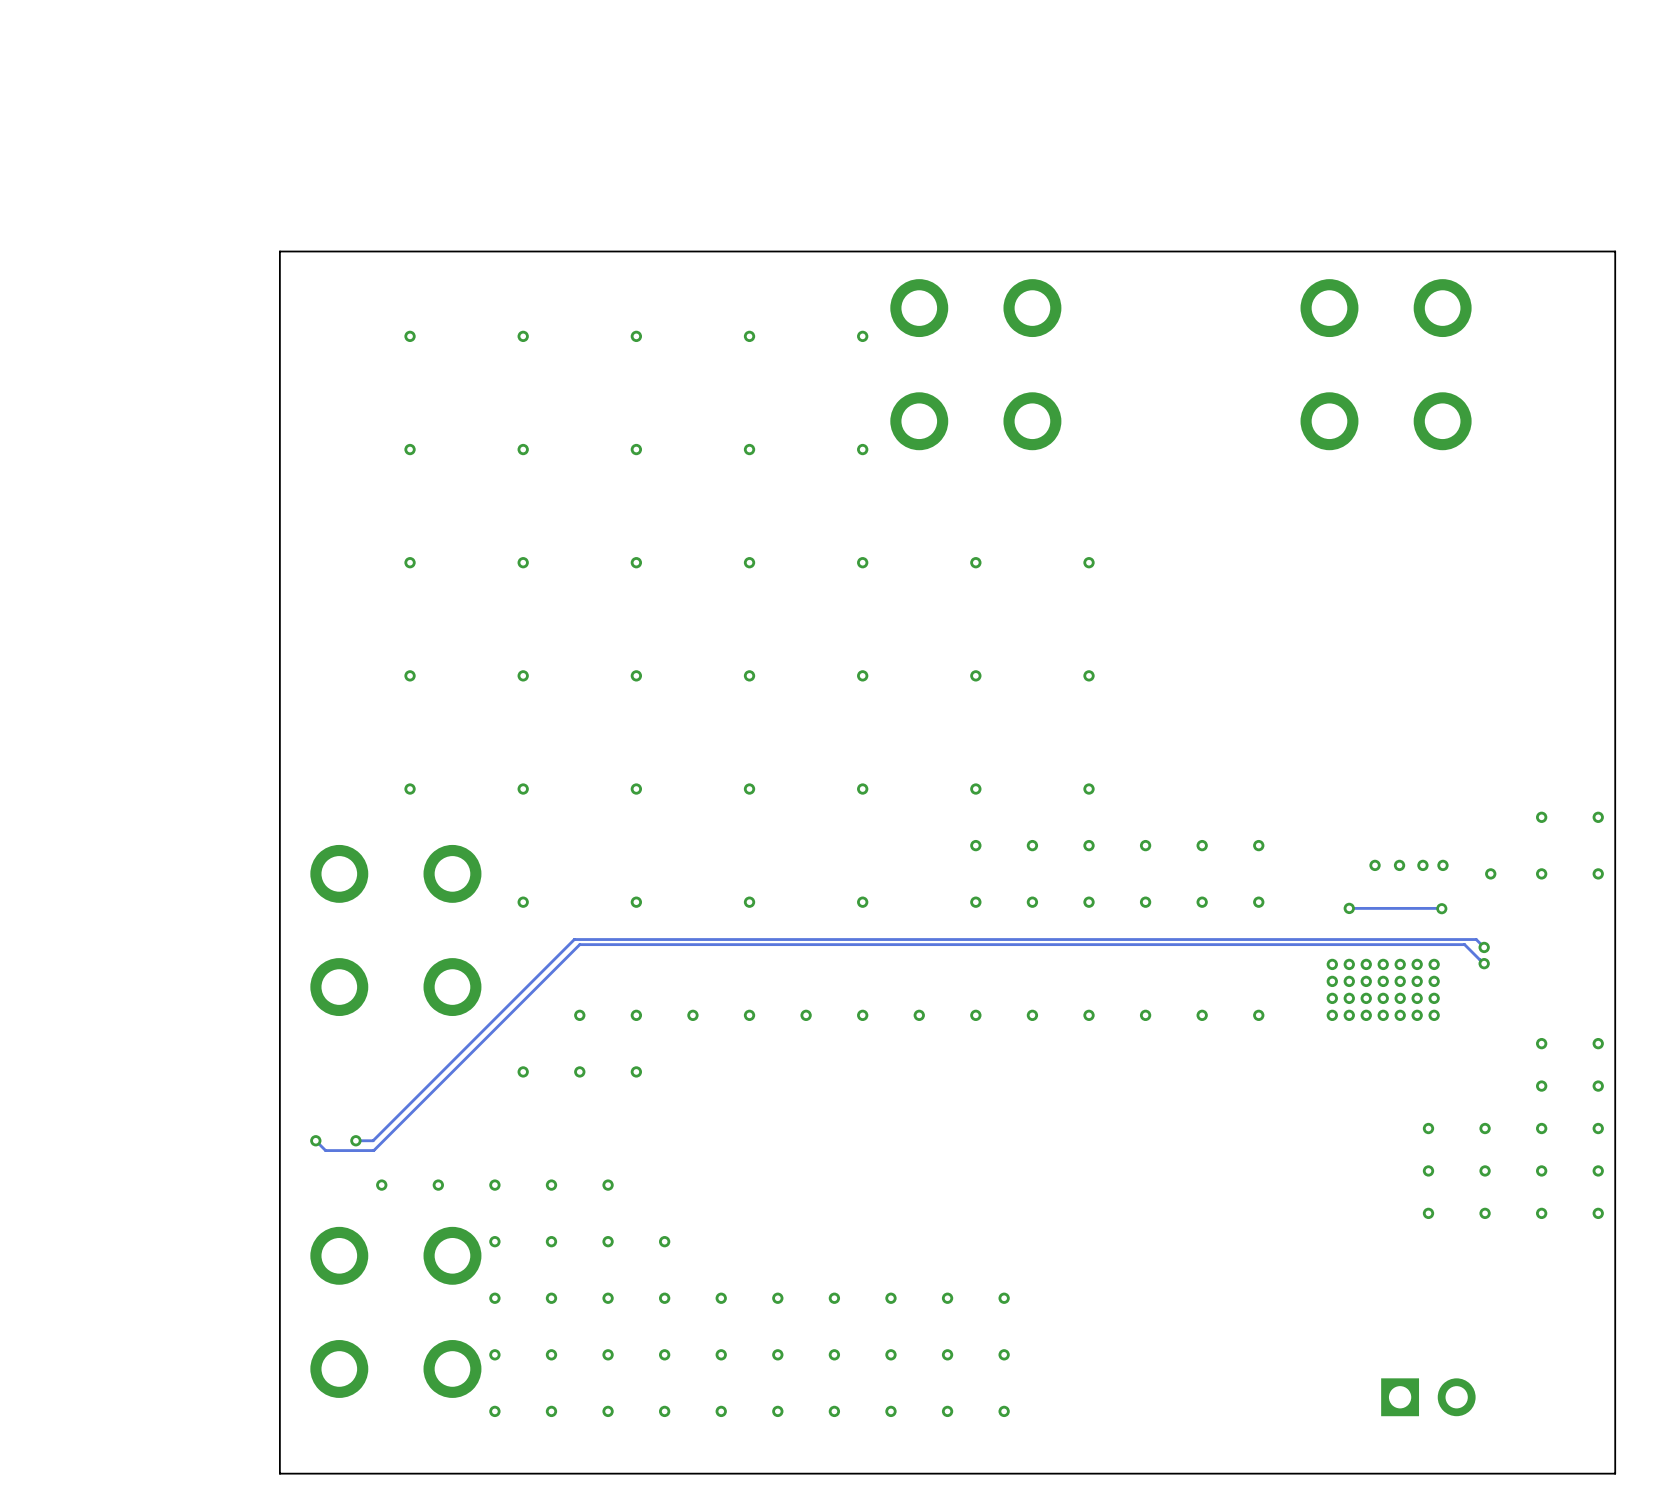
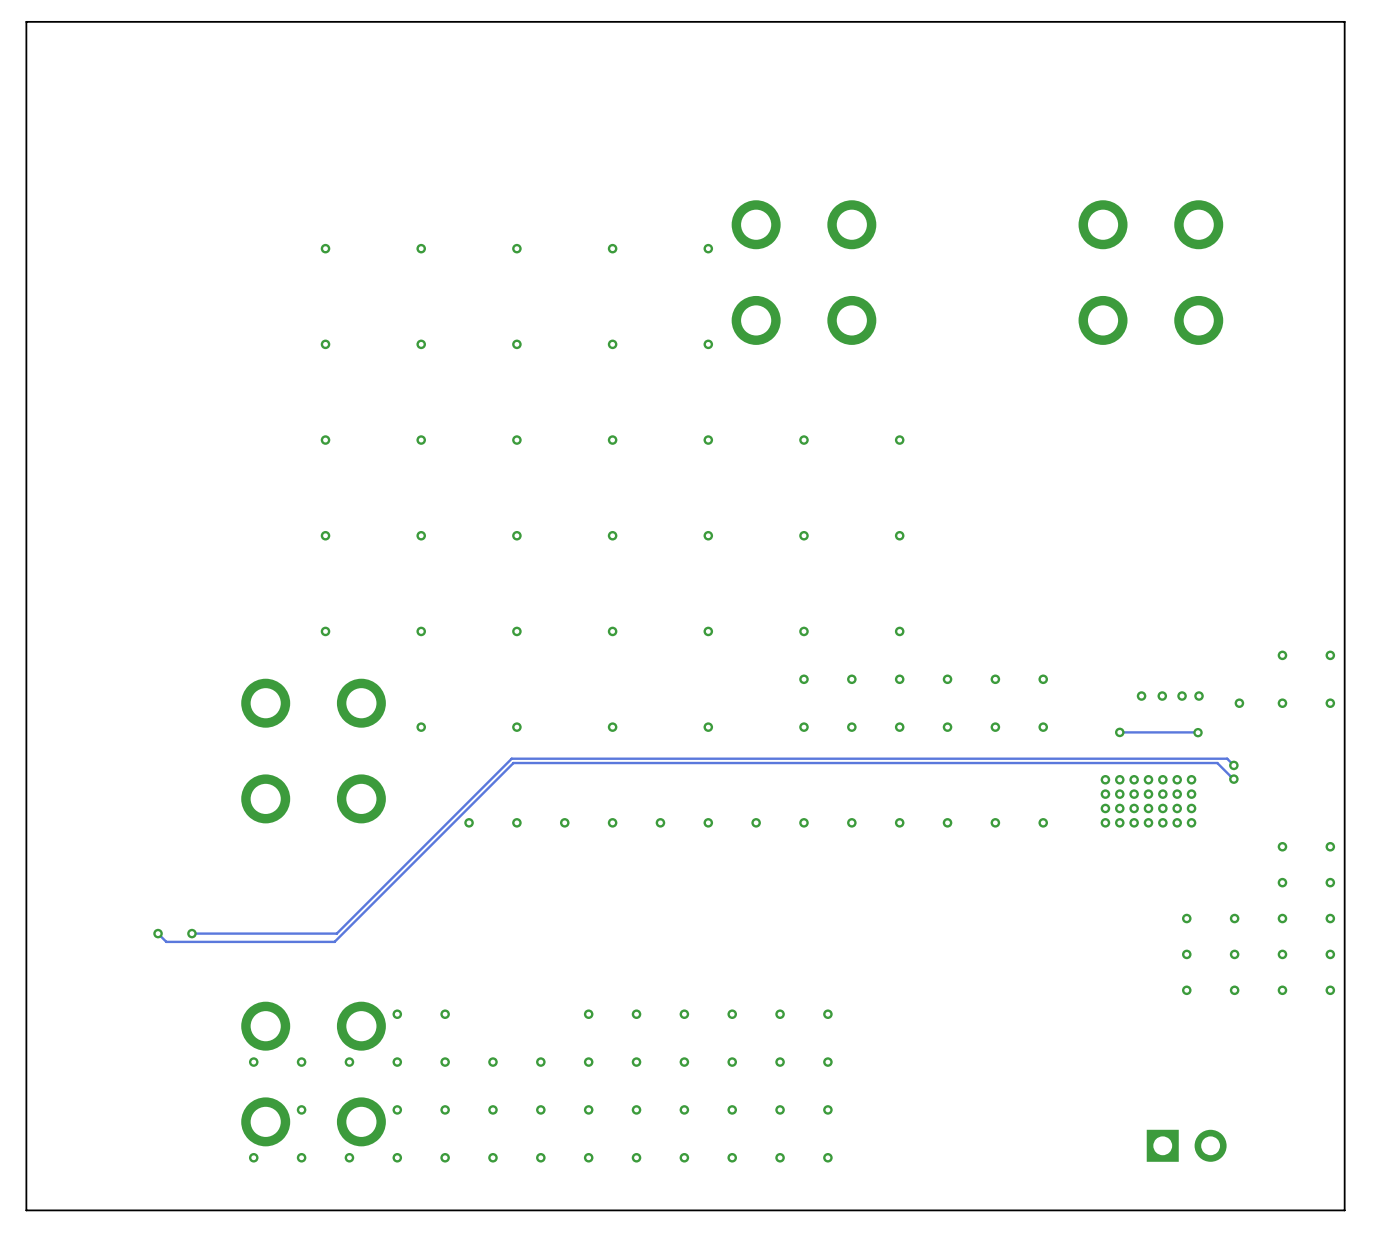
board edge: (1615, 251) (279, 251) (279, 1473) -> (1344, 176) (1344, 21) (26, 21) (26, 1210) (215, 1210)
track: (630, 939) (574, 939) (373, 1140) (355, 1140) -> (511, 758) (336, 933) (191, 933)
track: (632, 944) (579, 944) (373, 1150) (325, 1150) (315, 1140) -> (513, 763) (334, 941) (166, 941) (158, 933)
via: (523, 1071) -> none
via: (579, 1071) -> none
via: (636, 1071) -> none
via: (315, 1140) -> none
via: (355, 1140) -> none
via: none -> (158, 933)
via: none -> (191, 933)
via: (381, 1185) -> none
via: (438, 1185) -> none
via: (494, 1185) -> none
via: (551, 1185) -> none
via: (608, 1185) -> none
via: (608, 1241) -> none
via: (664, 1241) -> none
via: none -> (588, 1014)
via: none -> (636, 1014)
via: none -> (684, 1014)
via: none -> (732, 1014)
via: none -> (780, 1014)
via: none -> (827, 1014)
via: none -> (253, 1062)
via: none -> (301, 1062)
via: none -> (349, 1062)
via: none -> (301, 1109)
via: none -> (253, 1157)
via: none -> (301, 1157)
via: none -> (349, 1157)

